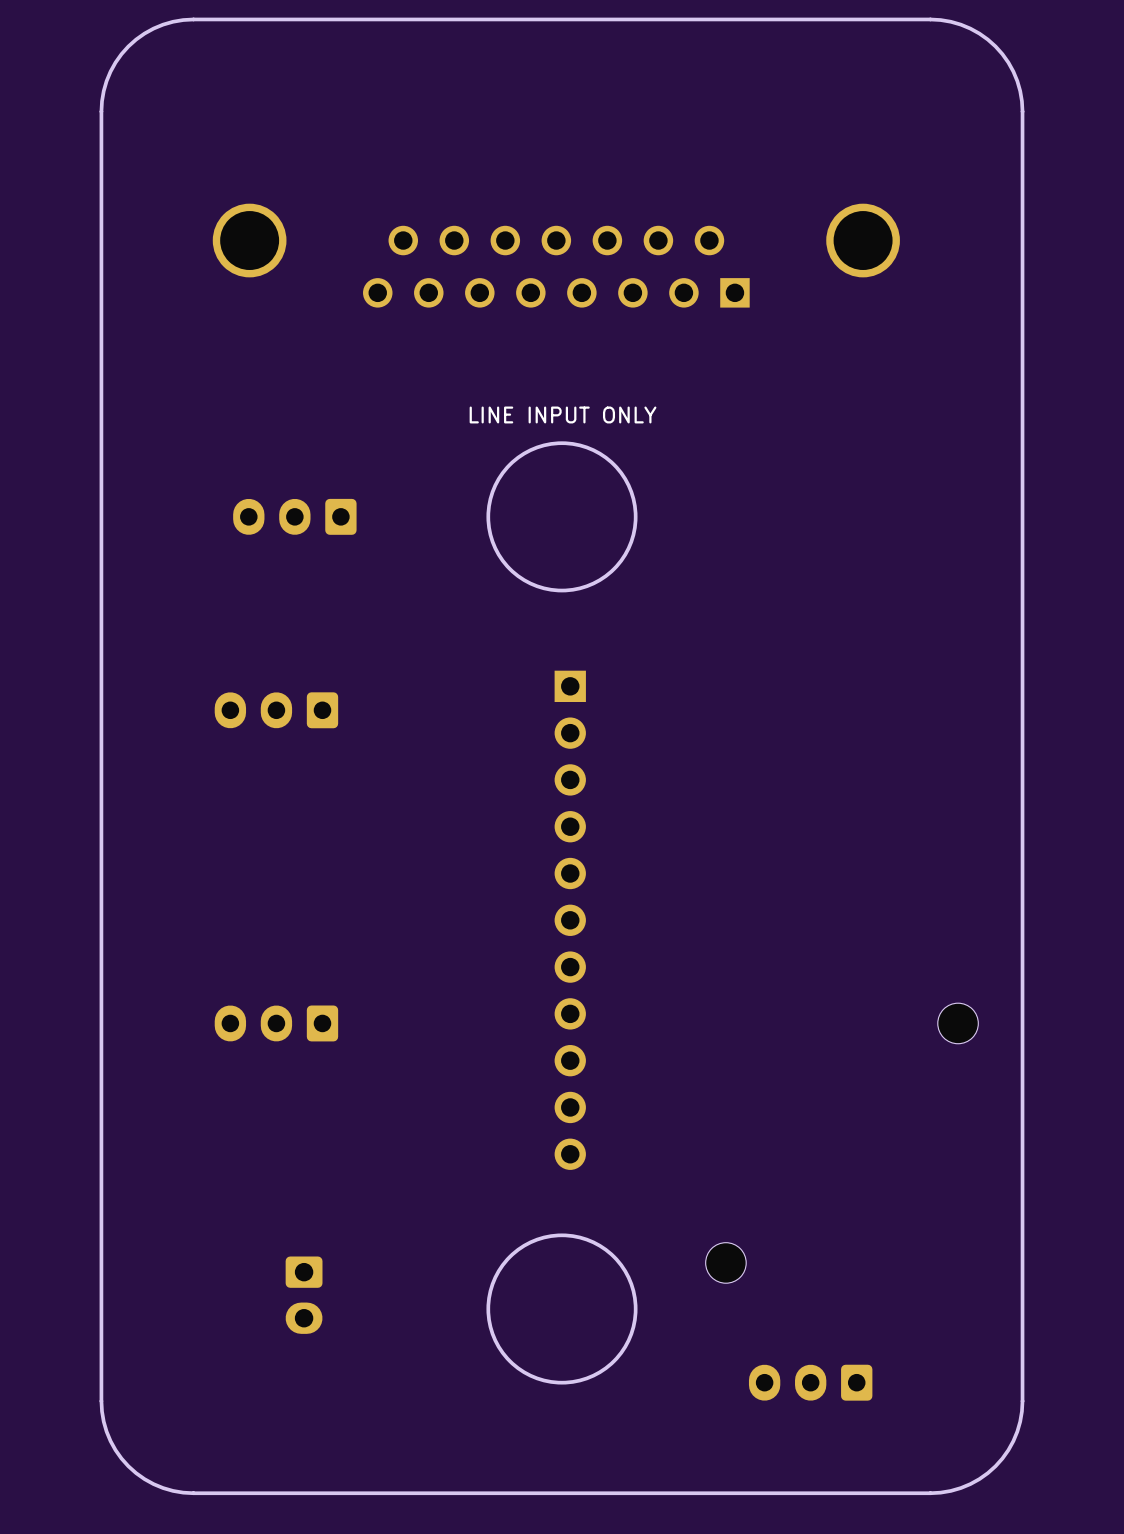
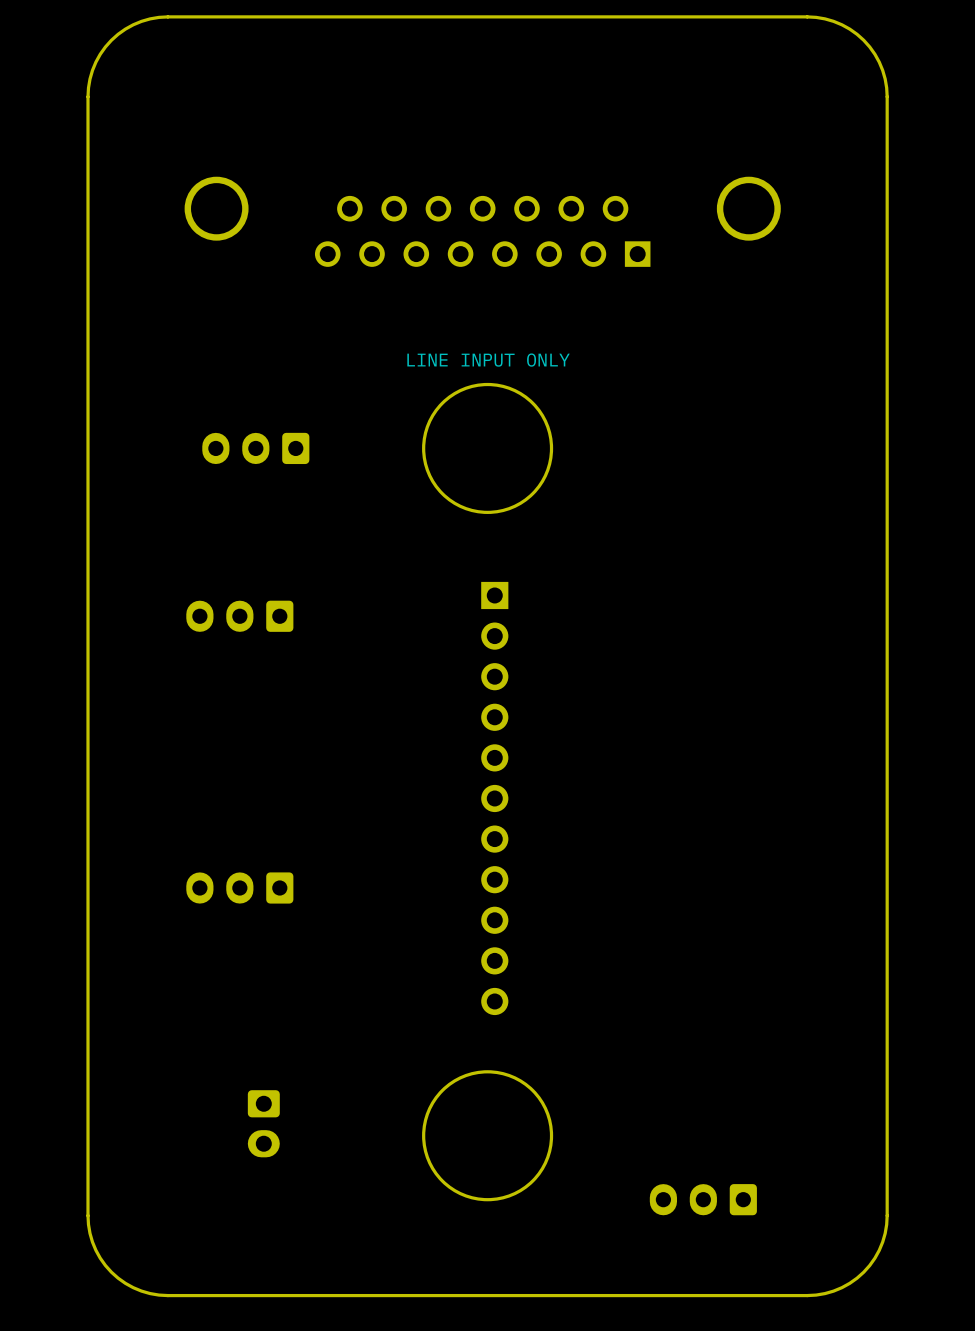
part: (958, 1023) -> none
part: (725, 1262) -> none

